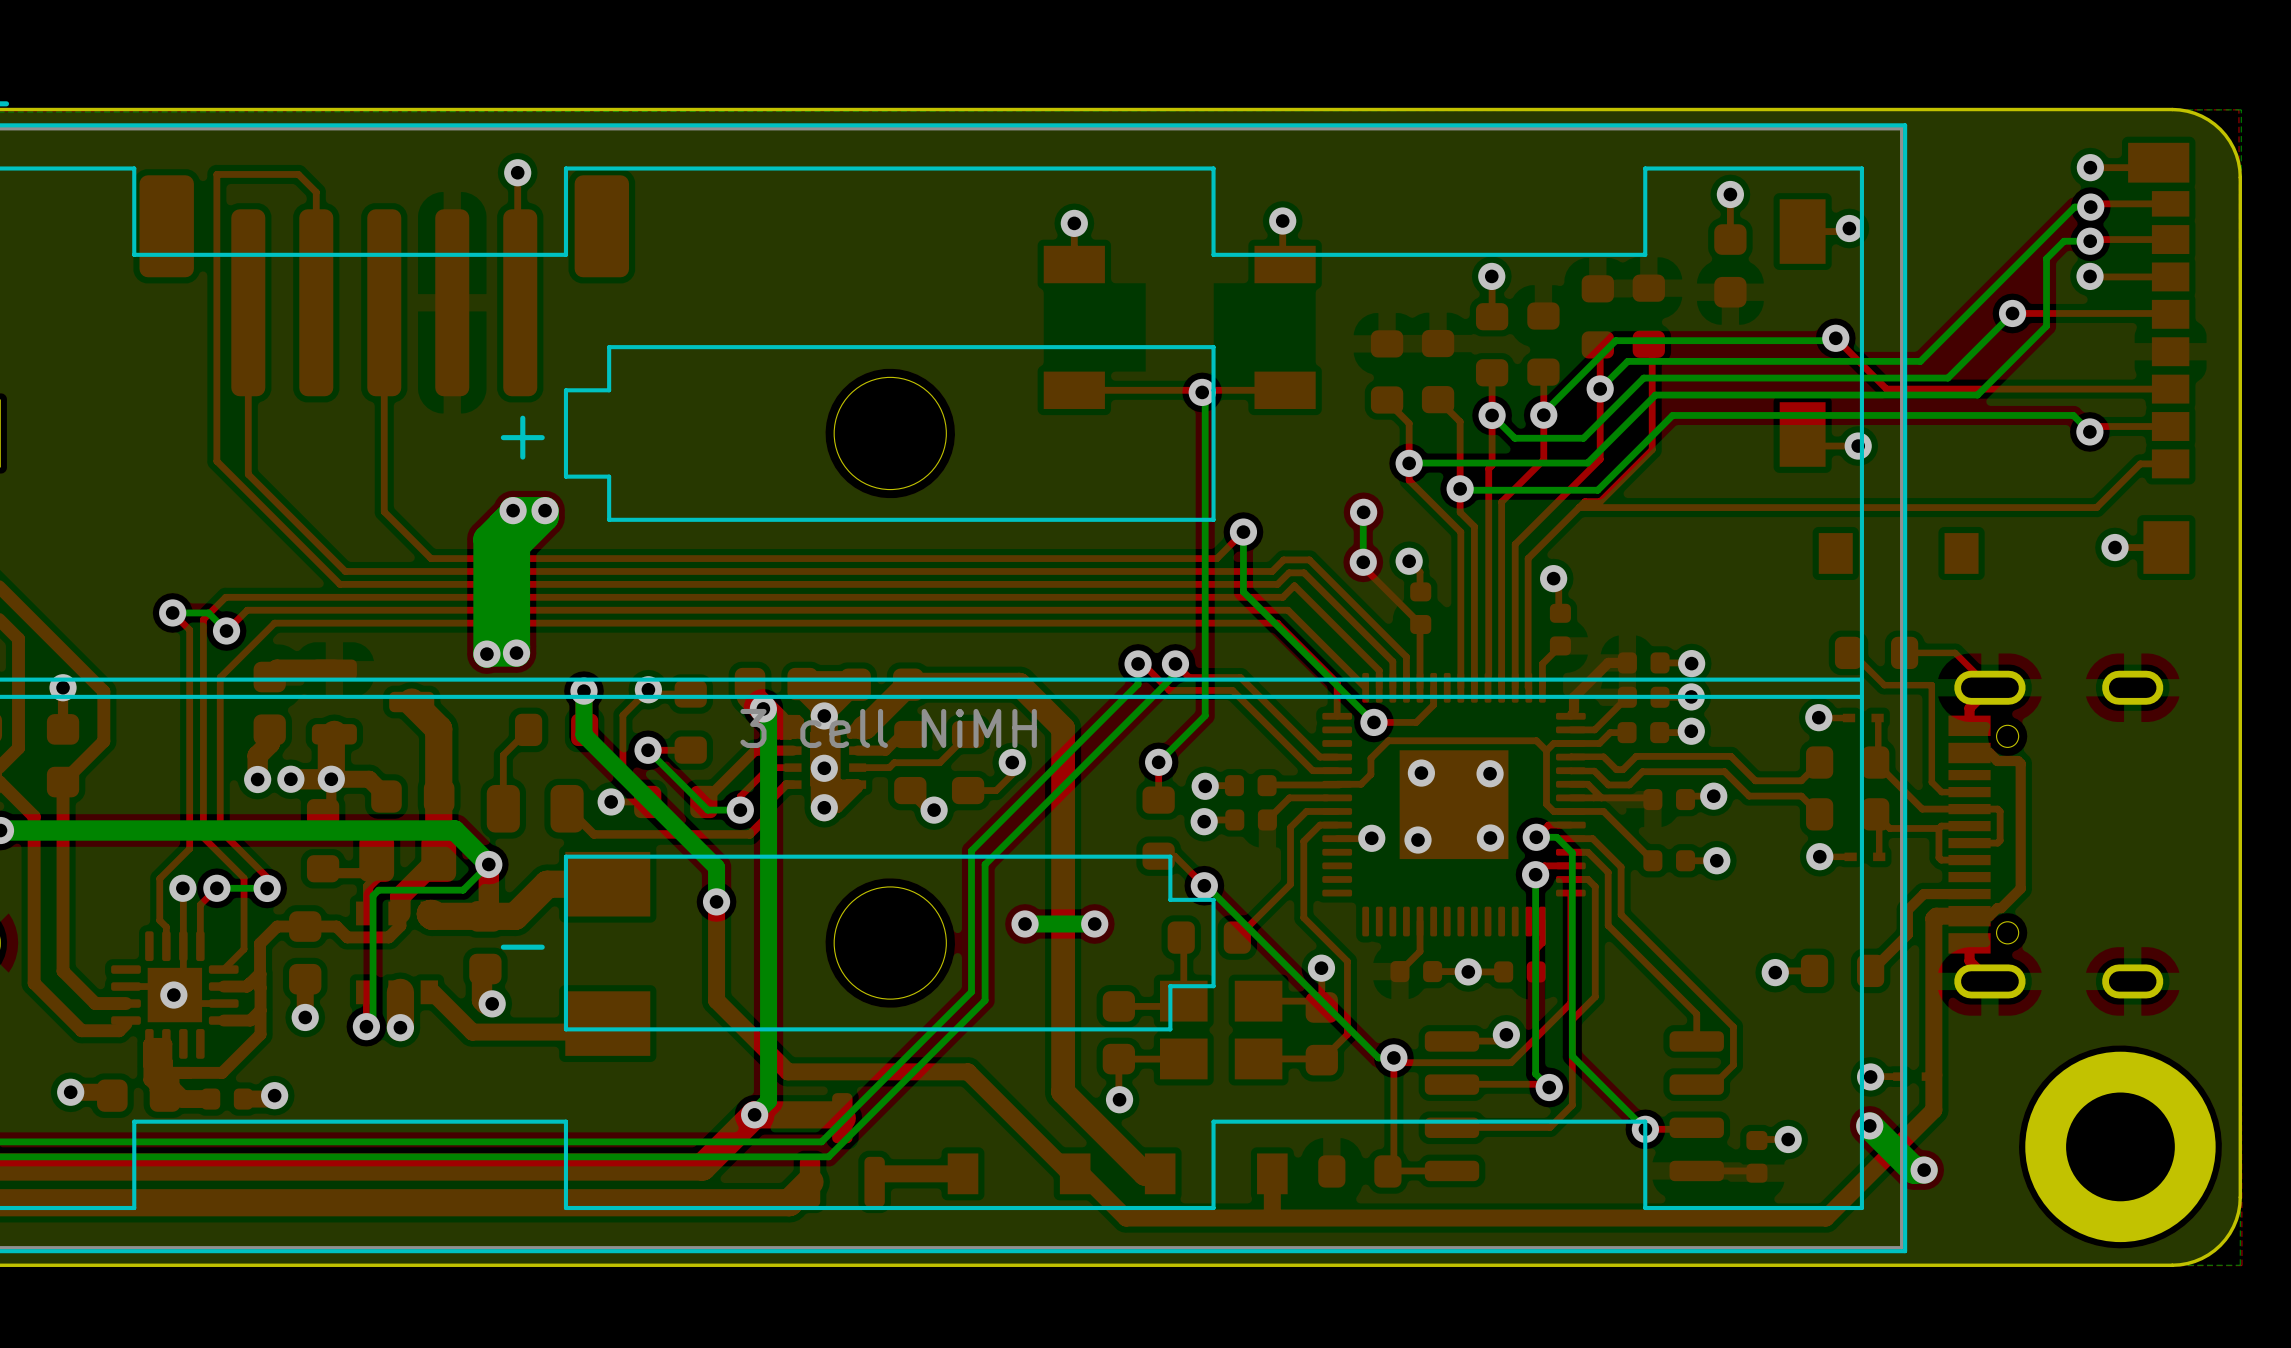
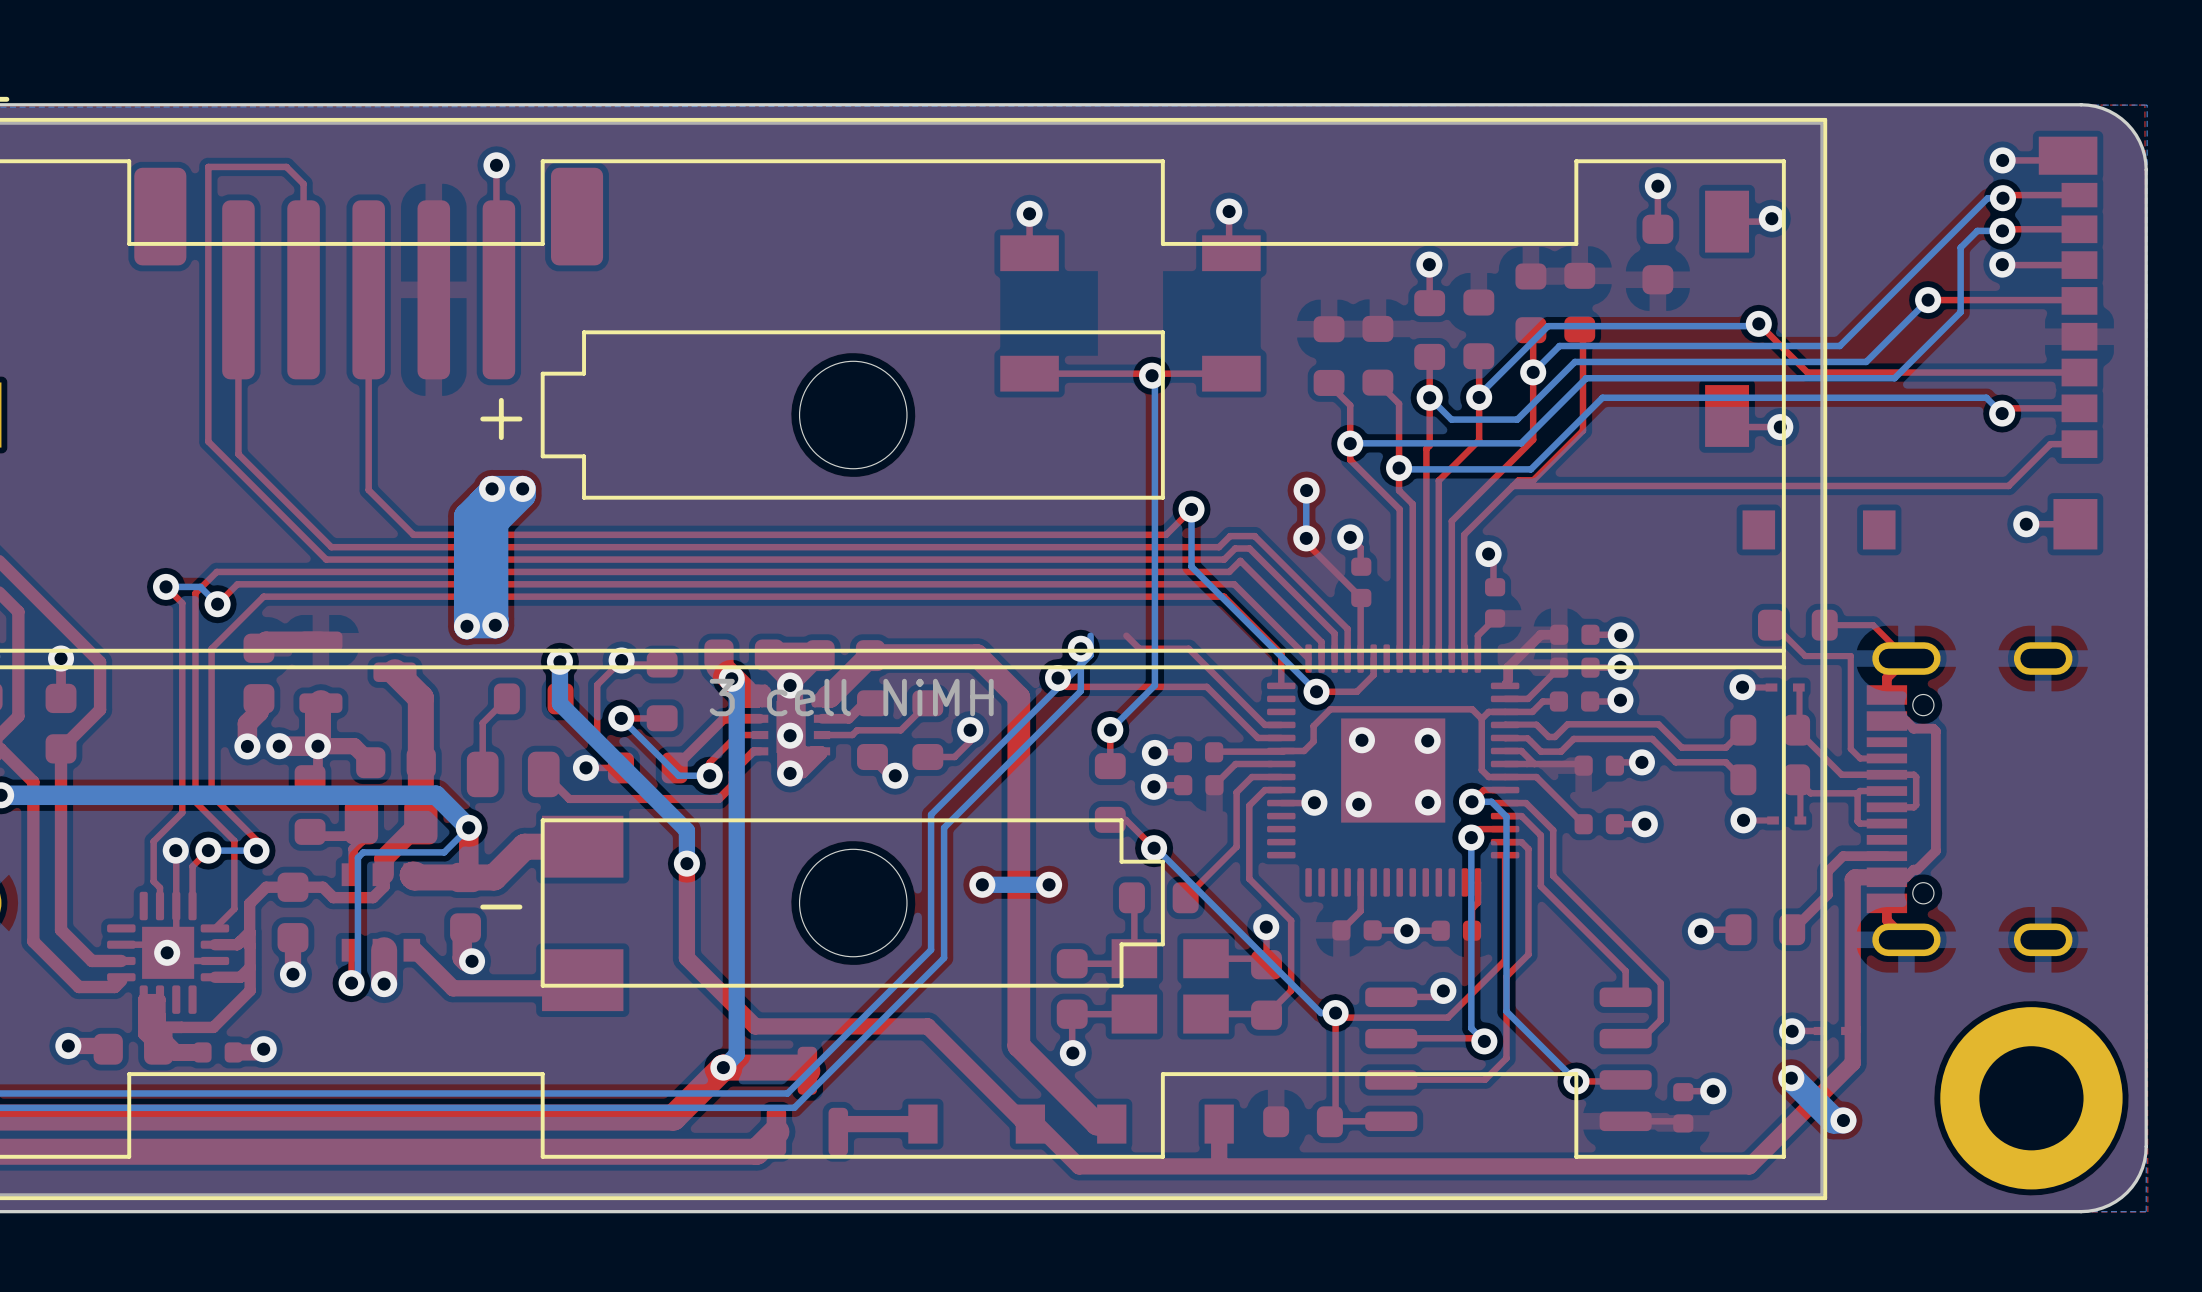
top track: (1138, 663) (1142, 663) (1169, 690) (1232, 690) (1259, 717) -> (1058, 678) (1066, 686) (1206, 686)
via position: (1138, 663) -> (1080, 648)
bottom track: (1175, 663) (1175, 674) (1127, 721) -> (1080, 648) (1080, 691)
via: (1175, 663) -> none
via: none -> (1058, 678)

